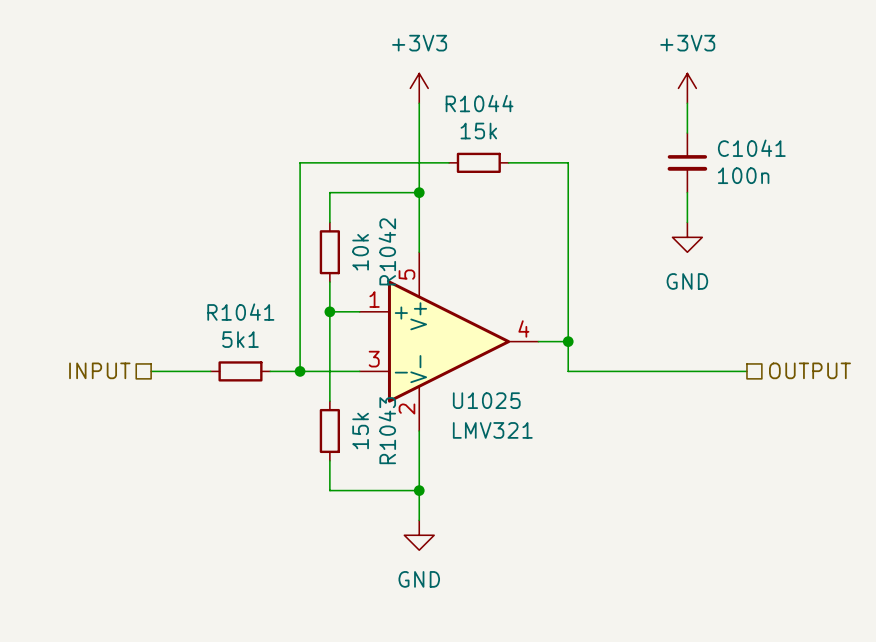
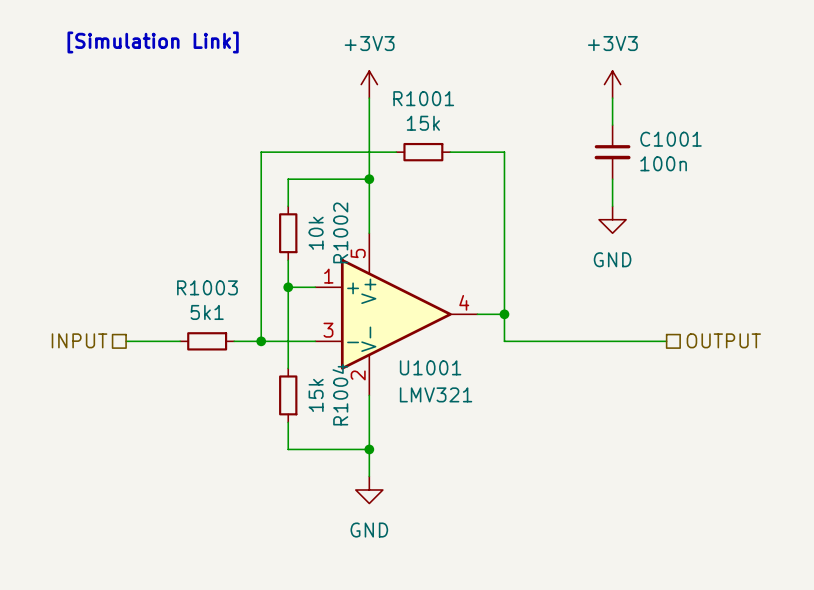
text: none -> [Simulation Link] (153, 42)
R1044 name: R1044 (479, 103) -> R1001 (423, 98)
C1041 name: C1041 (751, 148) -> C1001 (671, 139)
R1042 name: R1042 (387, 251) -> R1002 (340, 232)
R1041 name: R1041 (240, 312) -> R1003 (207, 287)
U1025 name: U1025 (486, 400) -> U1001 (430, 367)
R1043 name: R1043 (387, 430) -> R1004 (340, 394)

